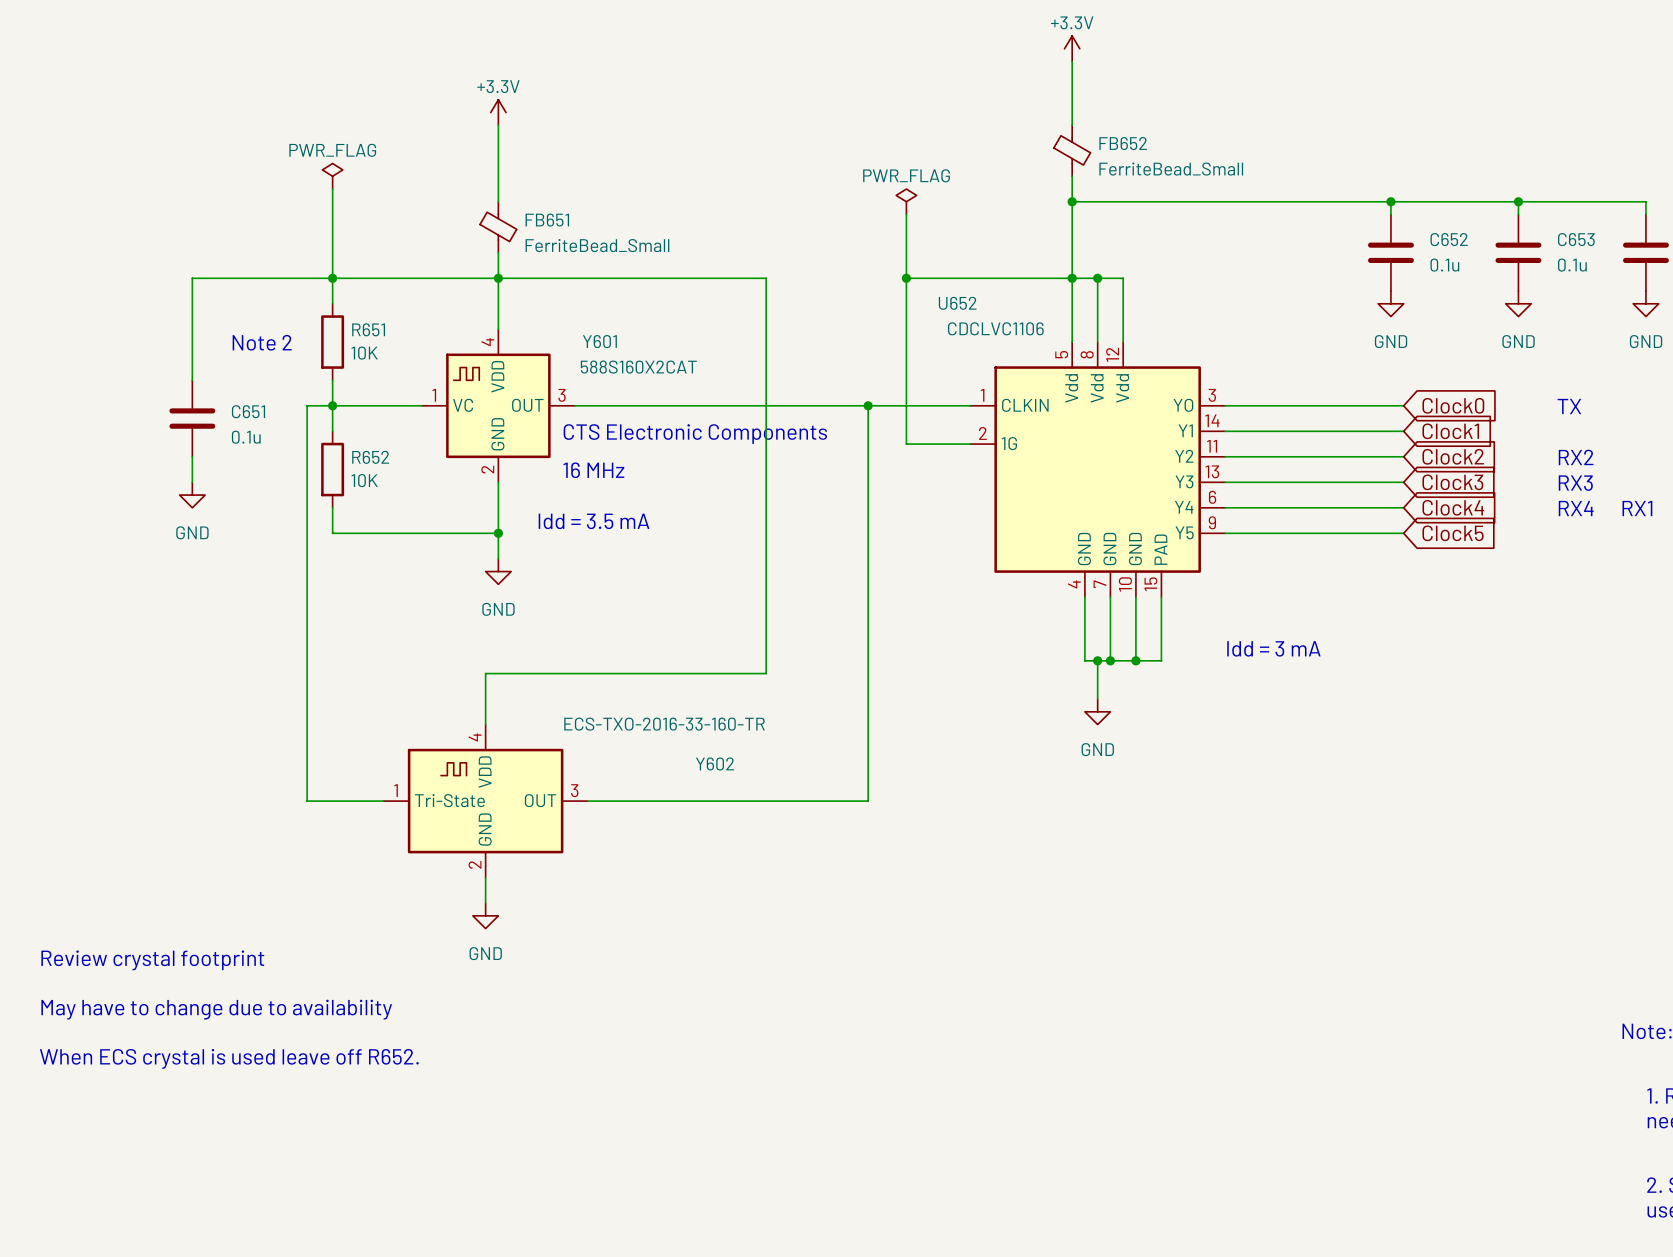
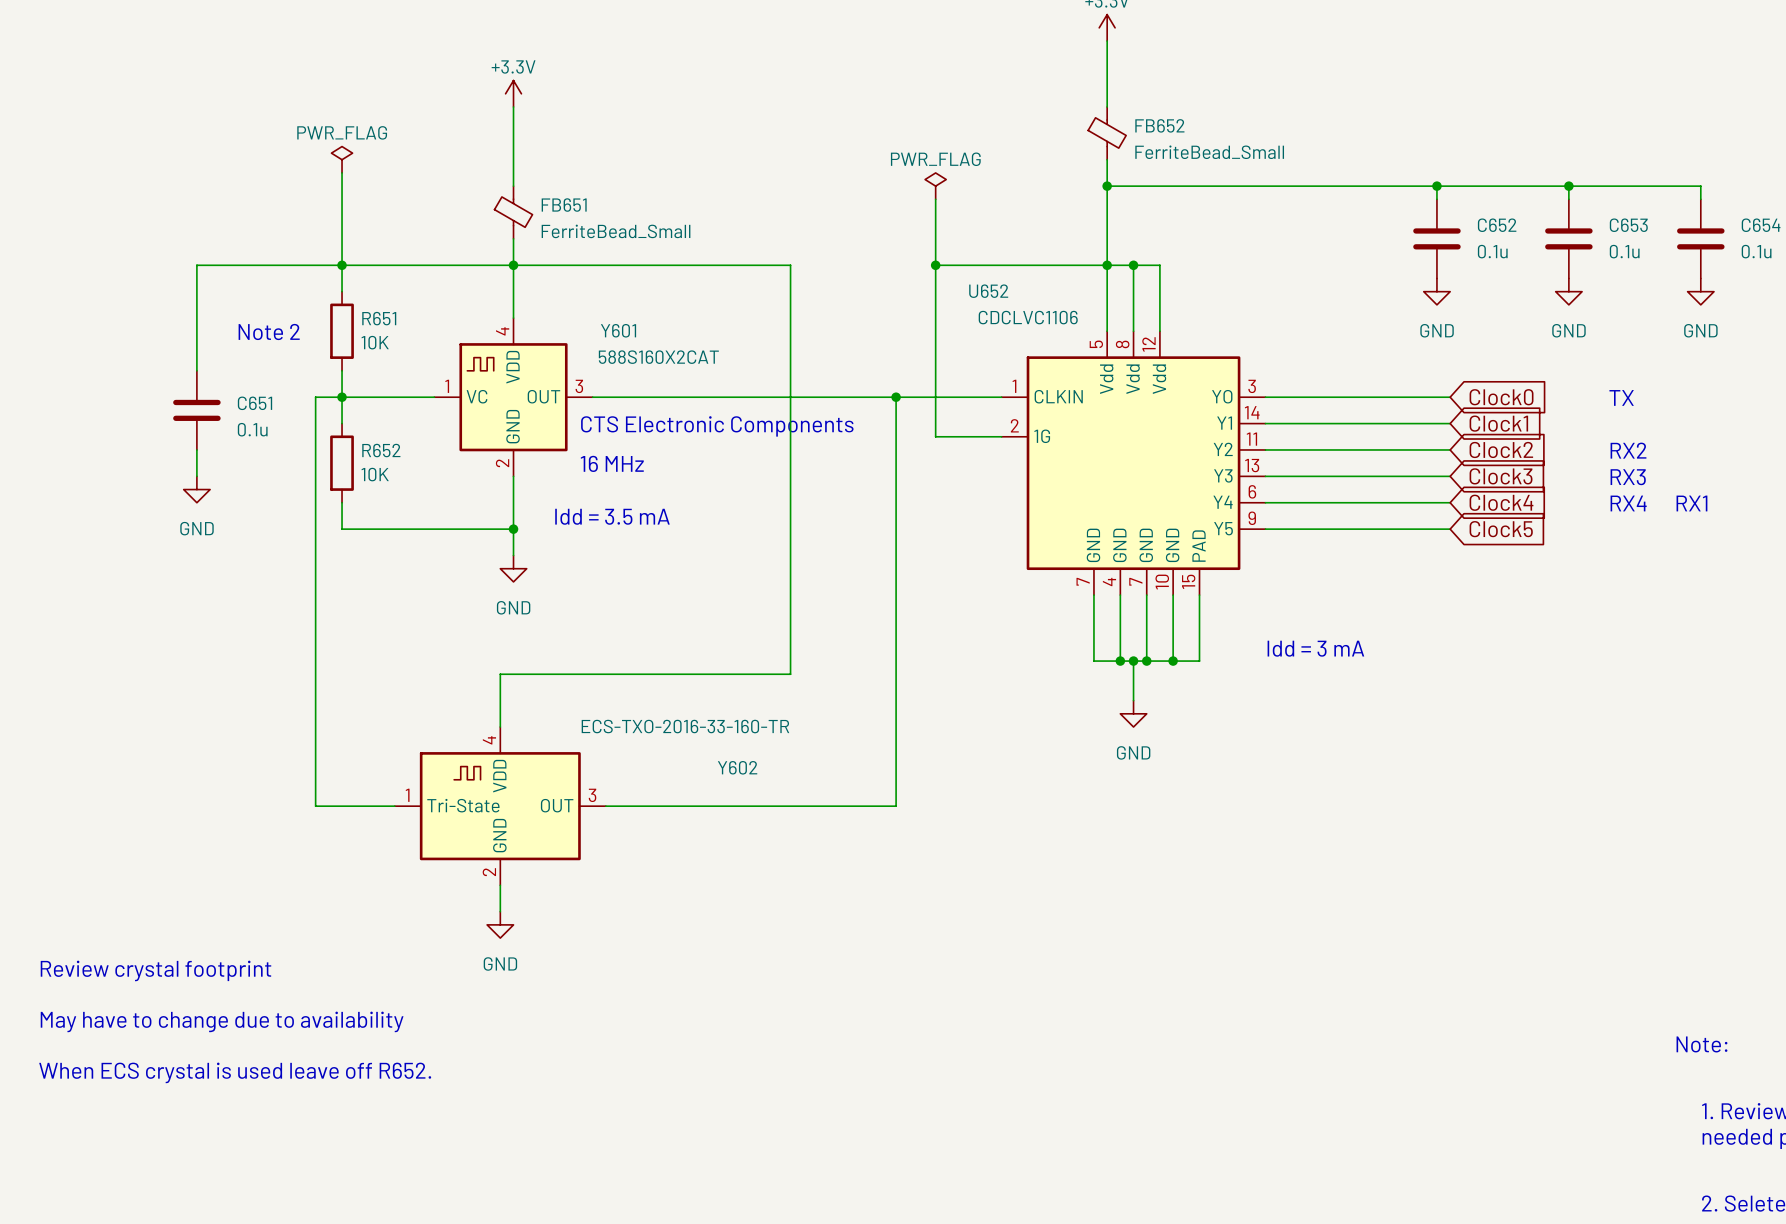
U652 symbol: [970, 342, 1226, 598] -> [1001, 331, 1266, 596]
wire: none -> (1093, 595) (1093, 661) (1120, 661)
junction: none -> (1120, 661)

